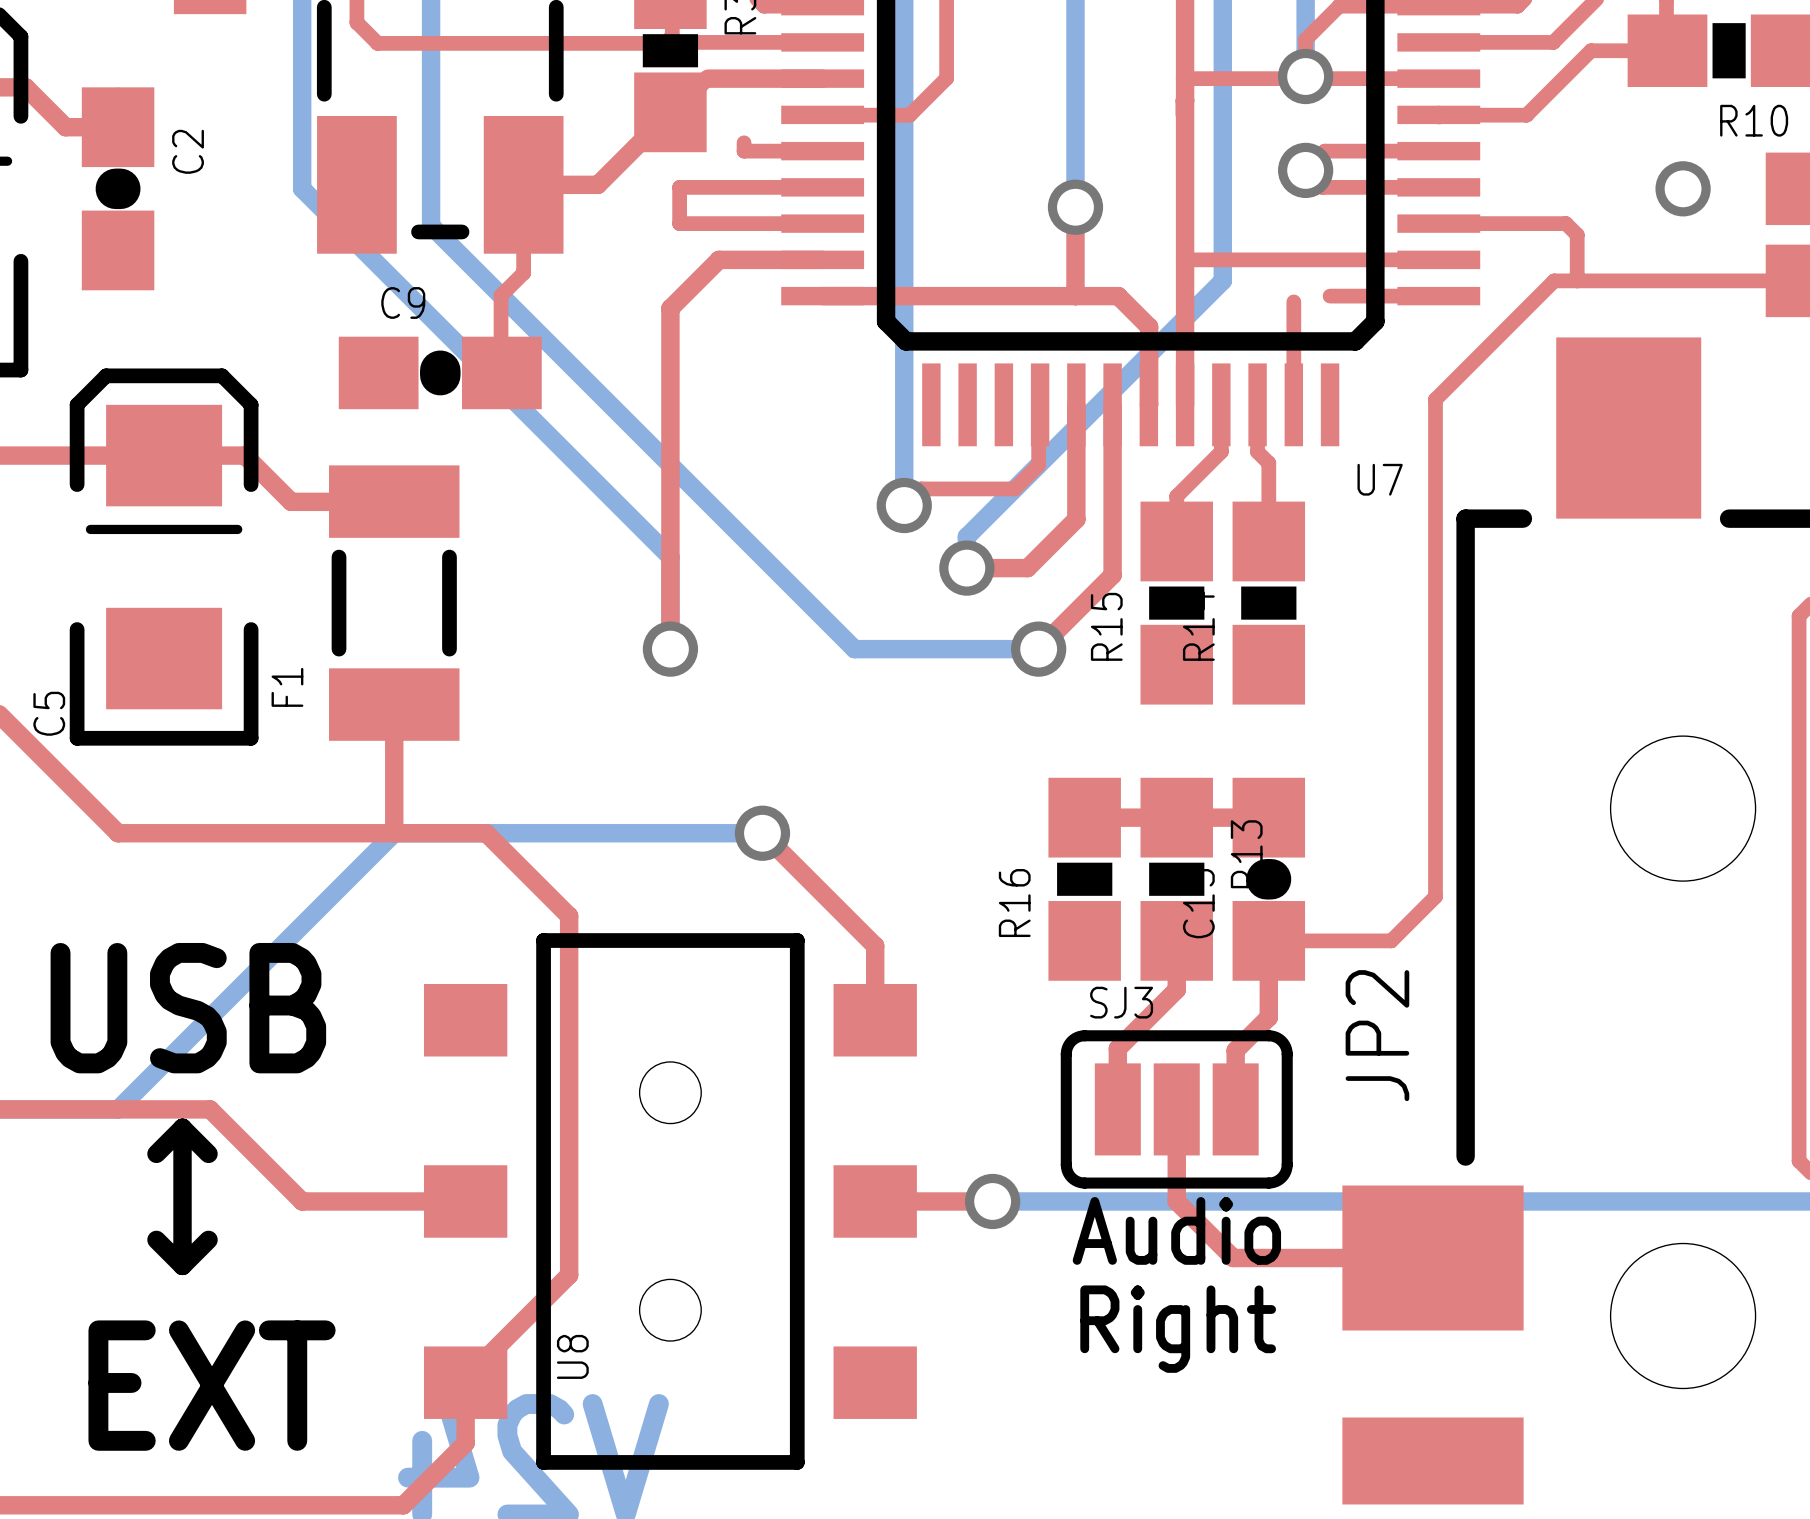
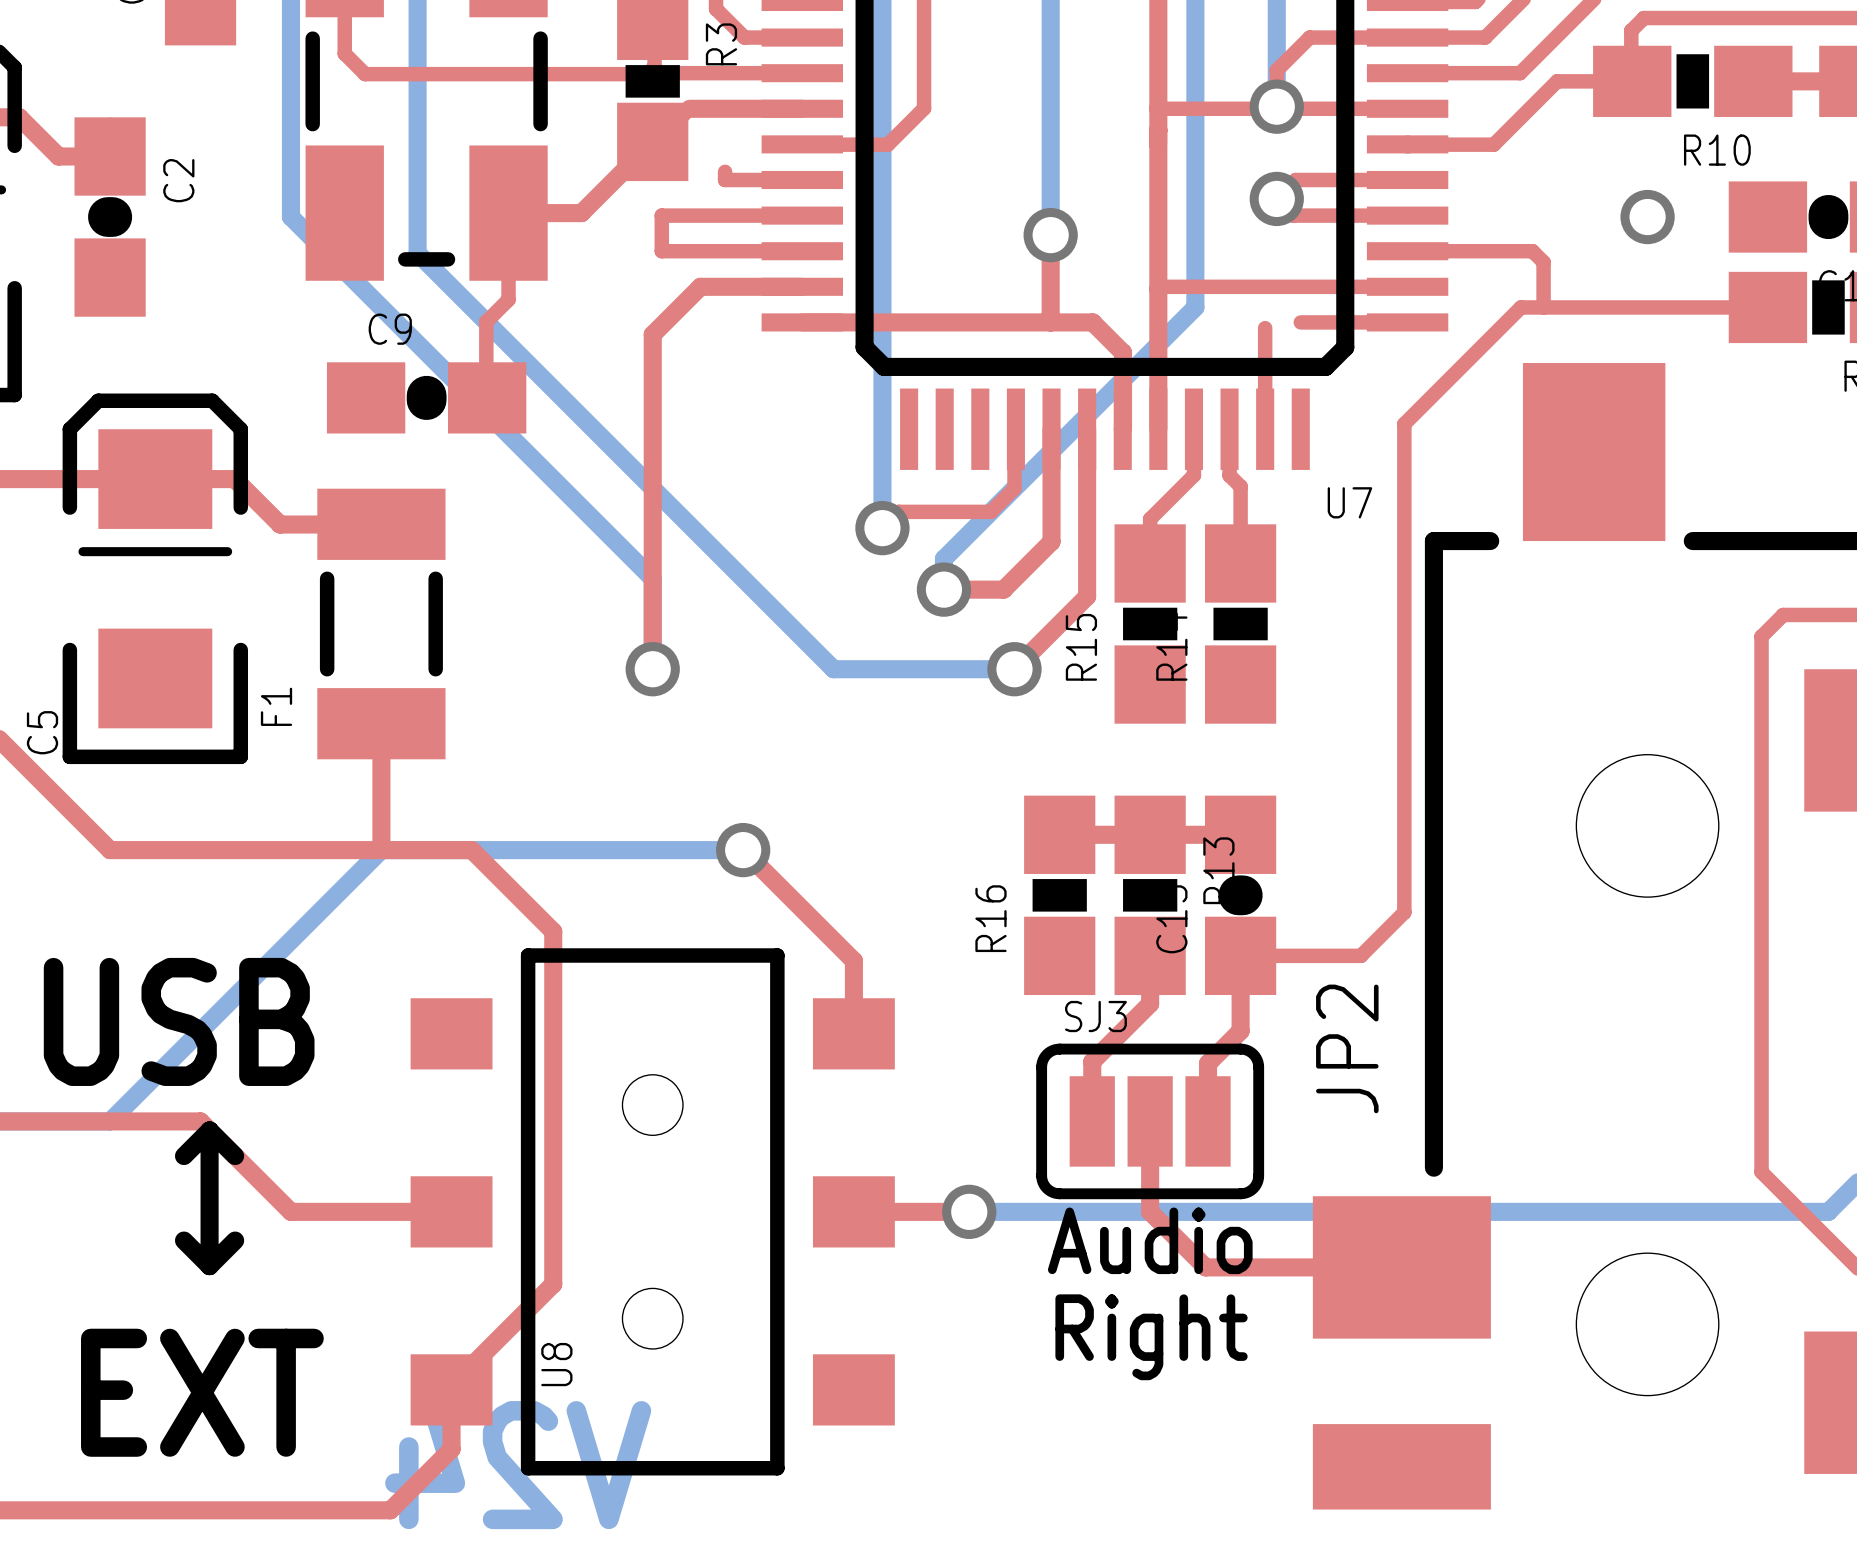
line: (182, 1127) (182, 1265) -> (209, 1130) (209, 1266)
line: (182, 1127) (156, 1153) -> (209, 1130) (183, 1156)
line: (182, 1127) (208, 1153) -> (209, 1130) (235, 1156)
line: (156, 1239) (182, 1265) -> (184, 1240) (209, 1266)
line: (208, 1239) (182, 1265) -> (235, 1240) (209, 1266)

